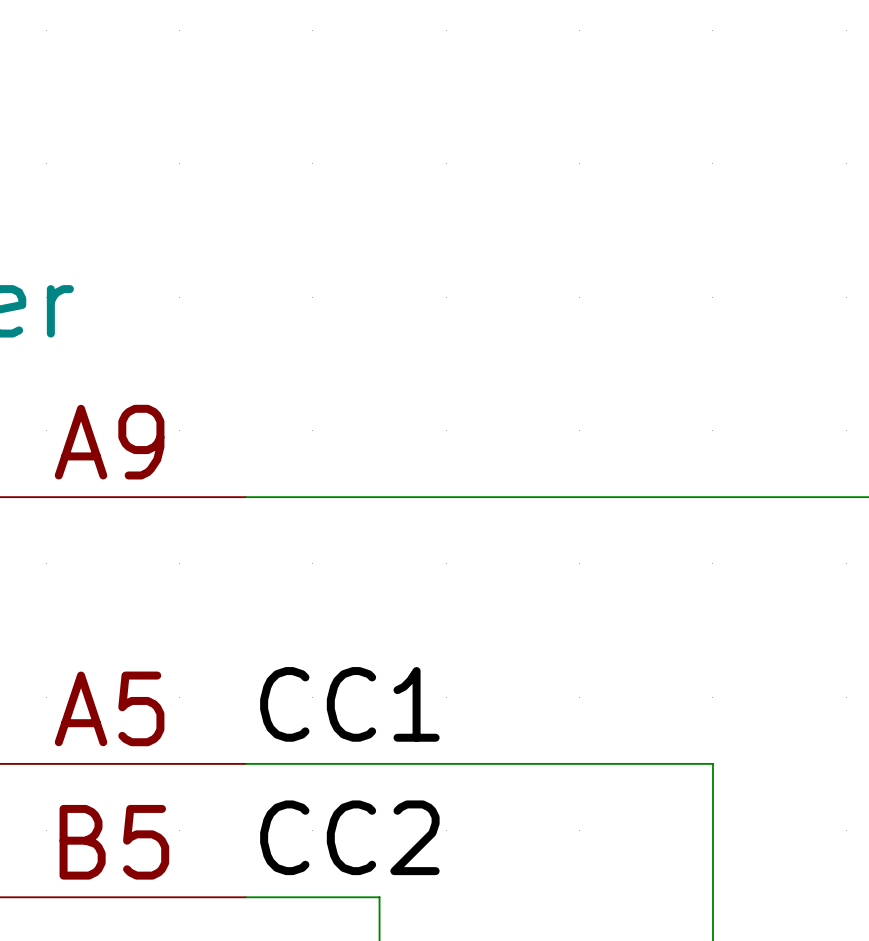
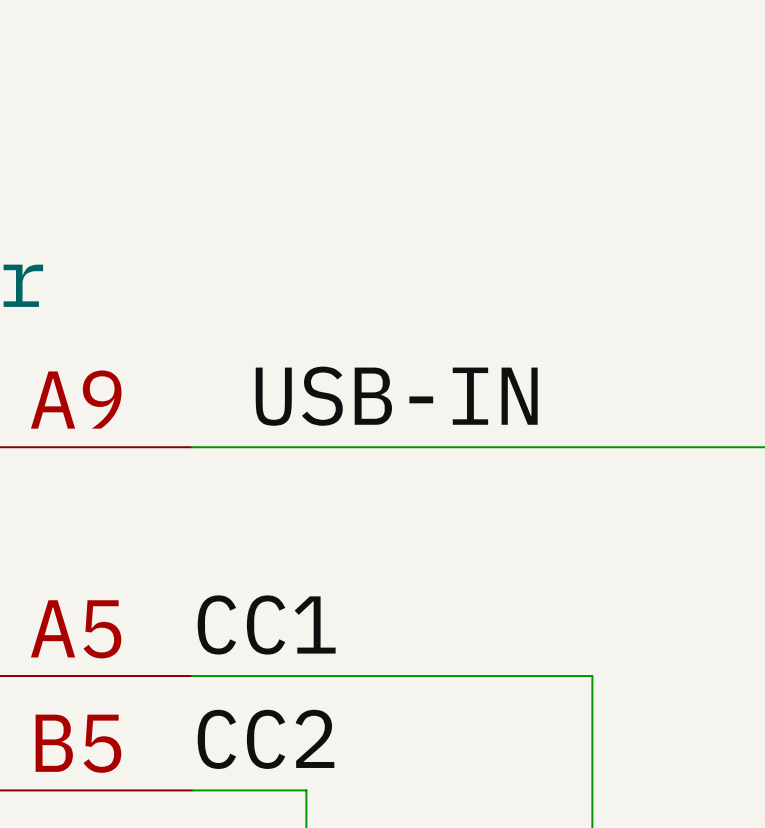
label: none -> USB-IN (396, 396)

